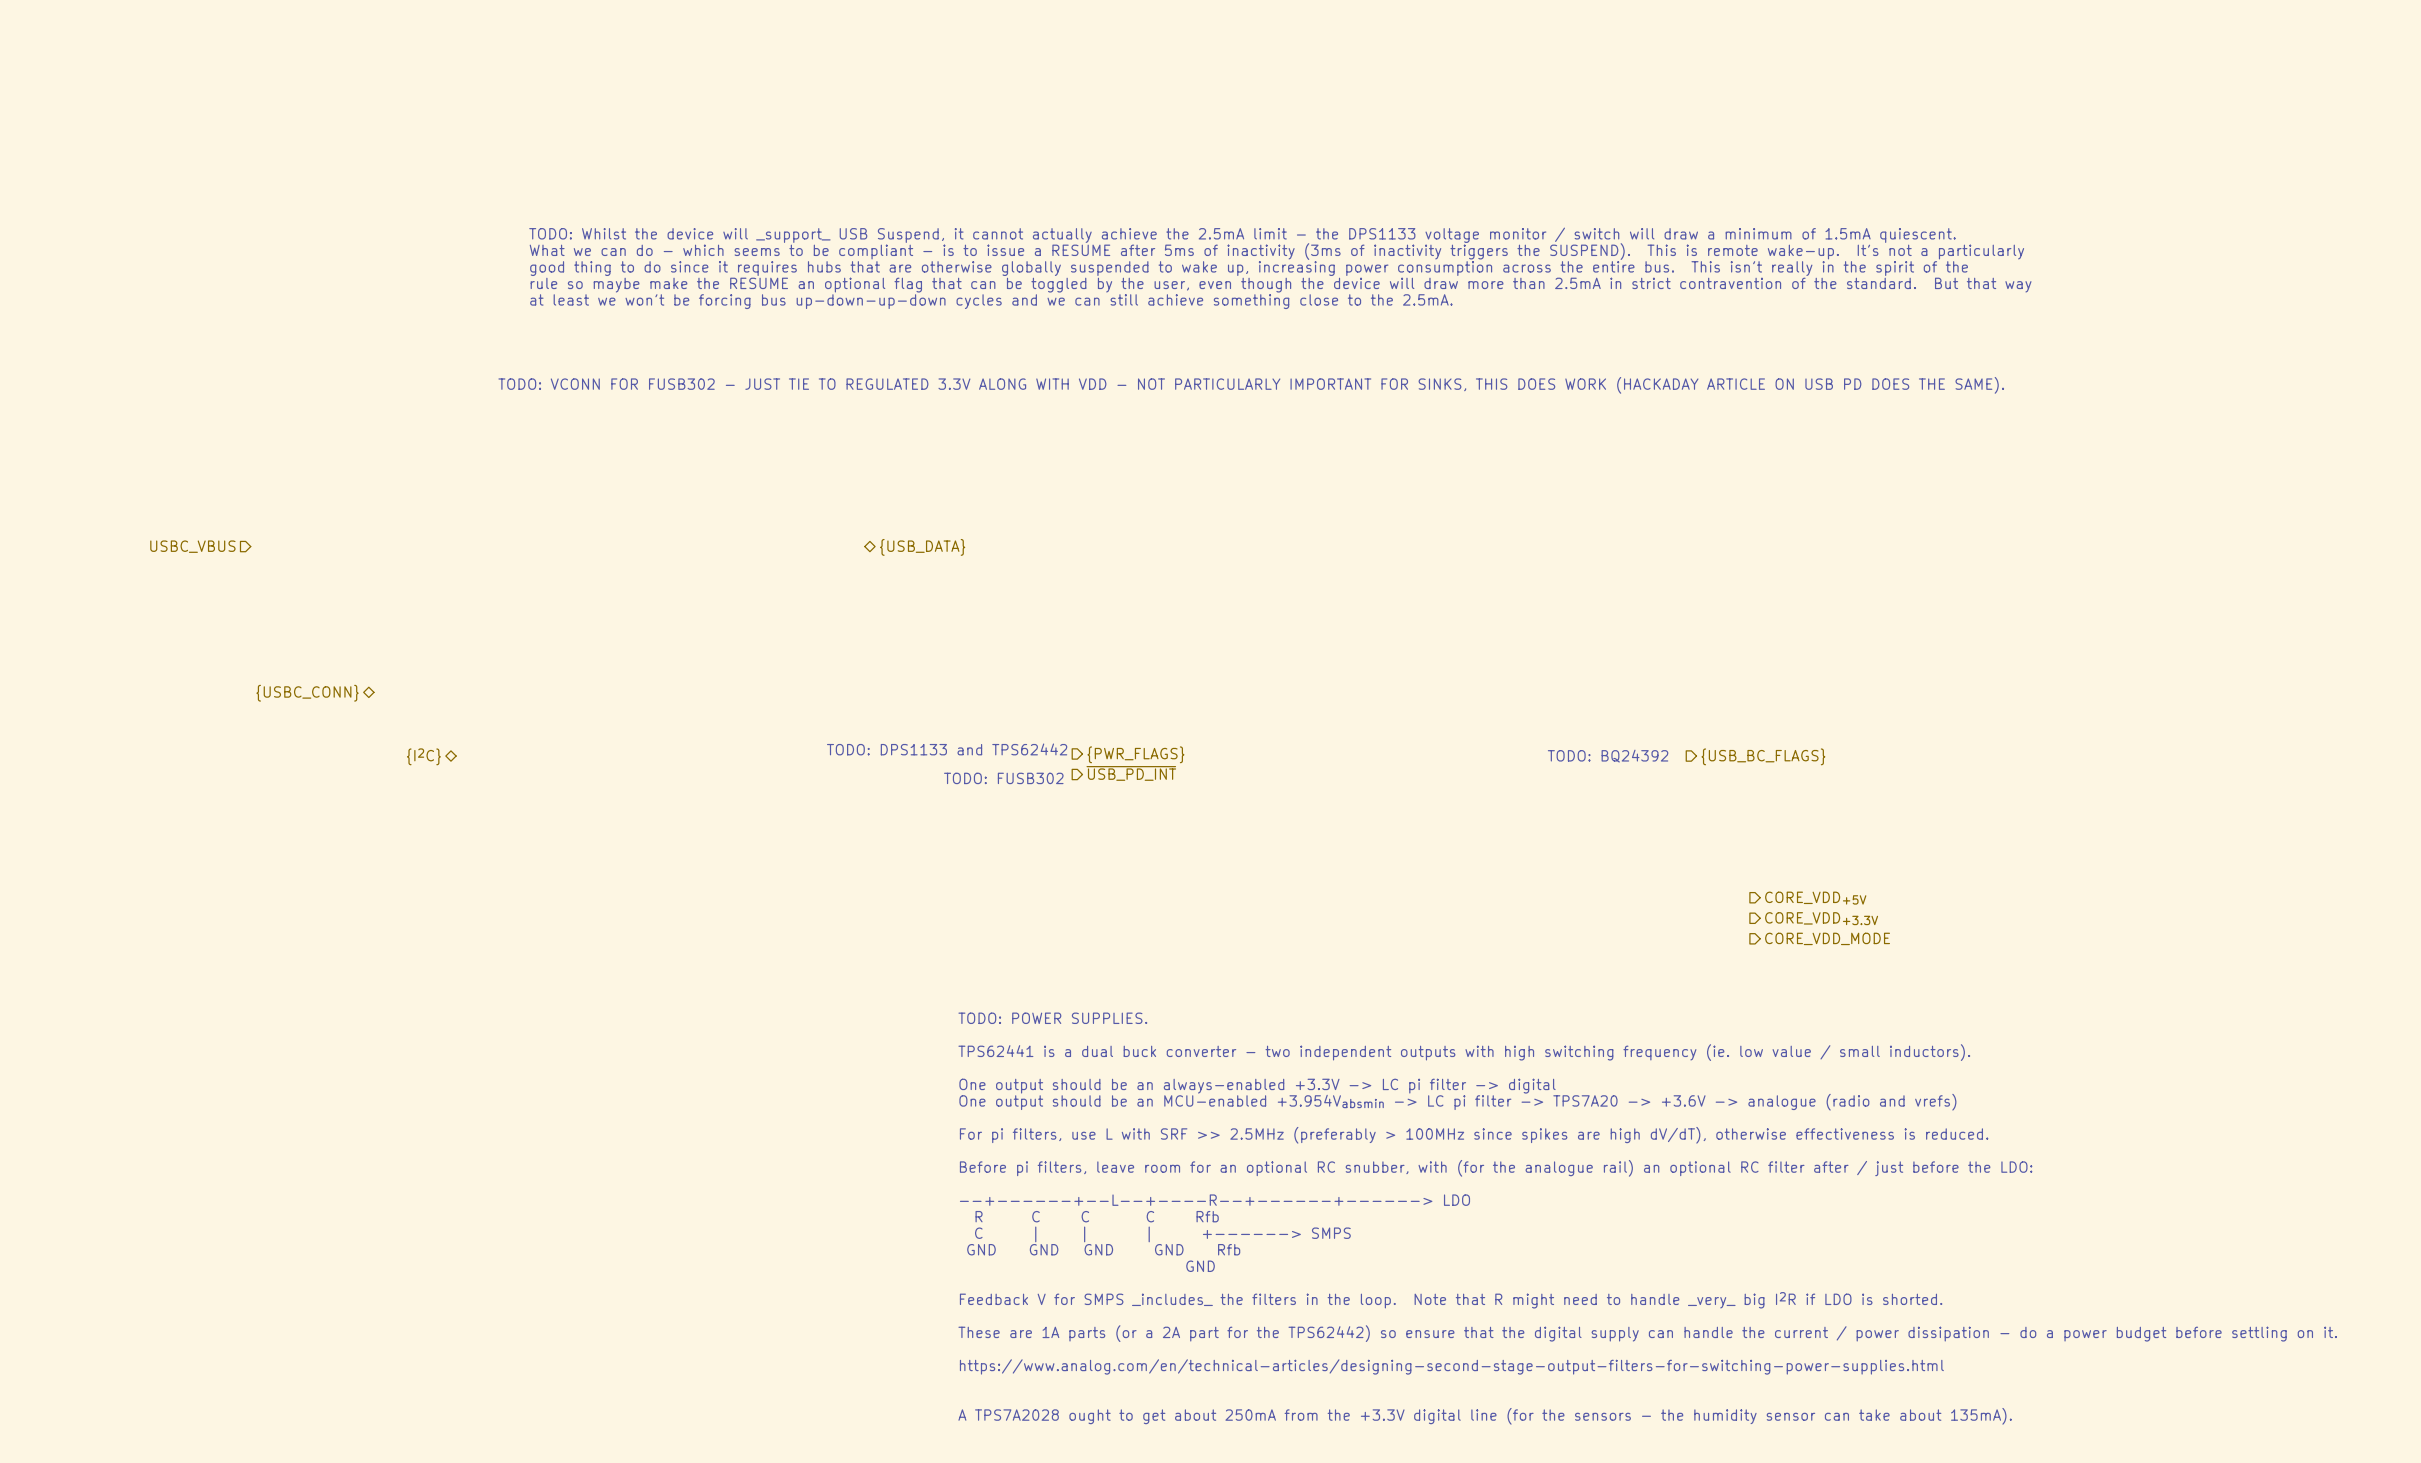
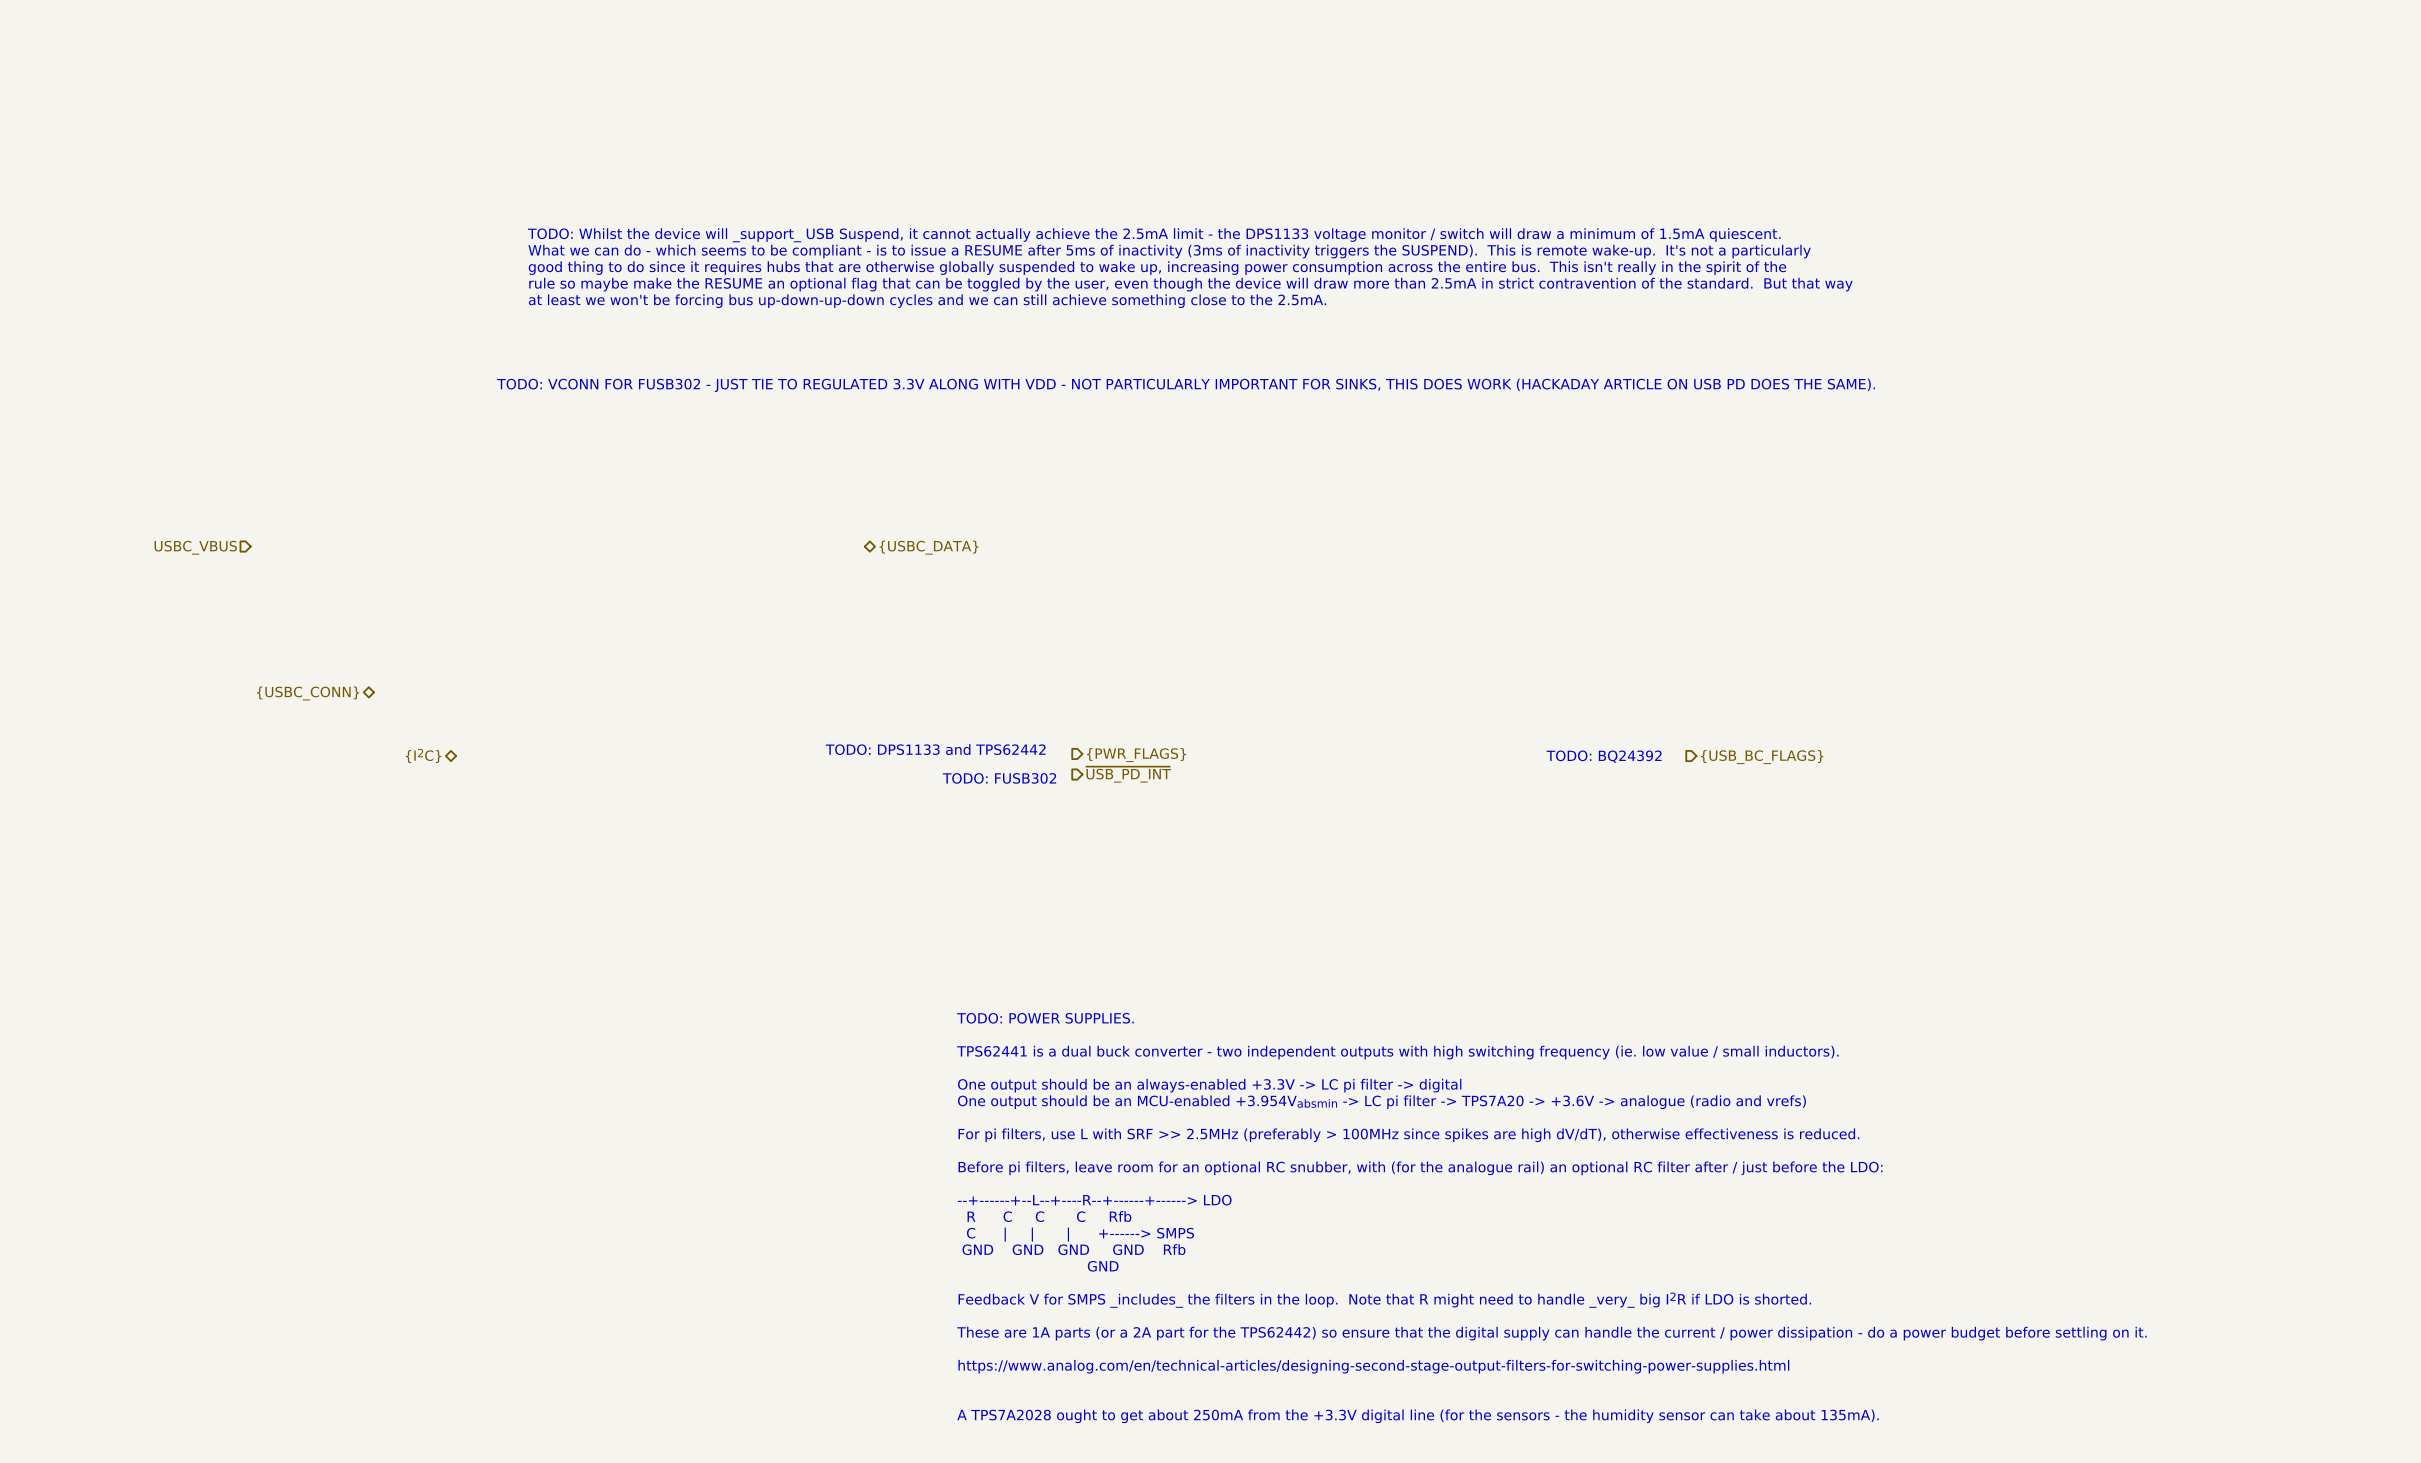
hierarchical label: {USB_DATA} (922, 547) -> {USBC_DATA} (929, 547)
hierarchical label: CORE_VDD+5V (1815, 898) -> none
hierarchical label: CORE_VDD+3.3V (1821, 918) -> none
hierarchical label: CORE_VDD_MODE (1827, 938) -> none

